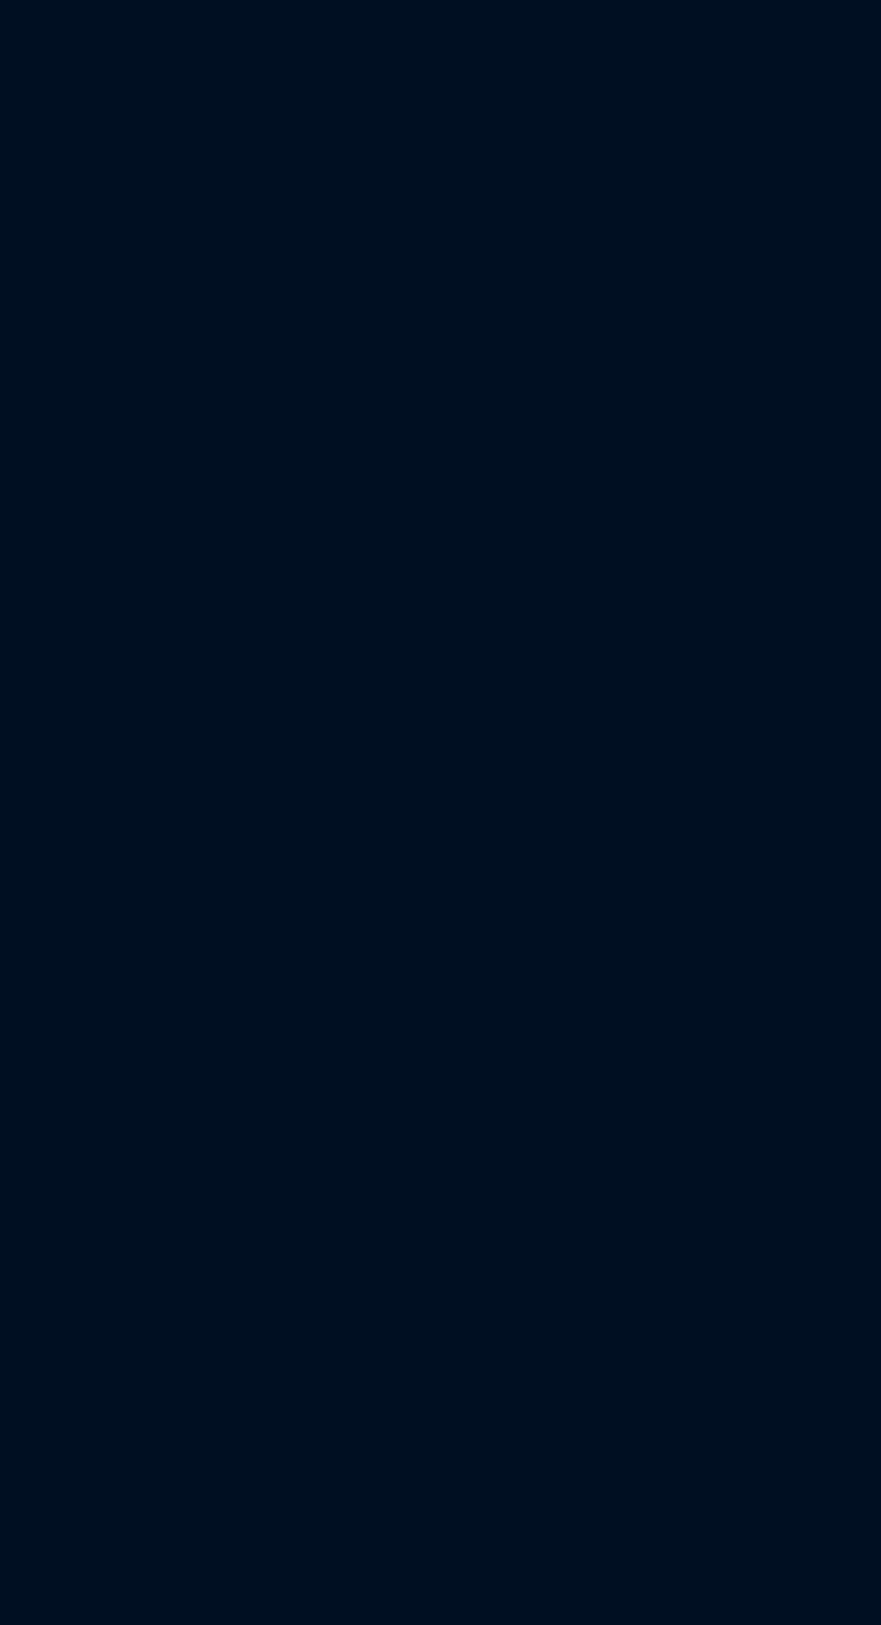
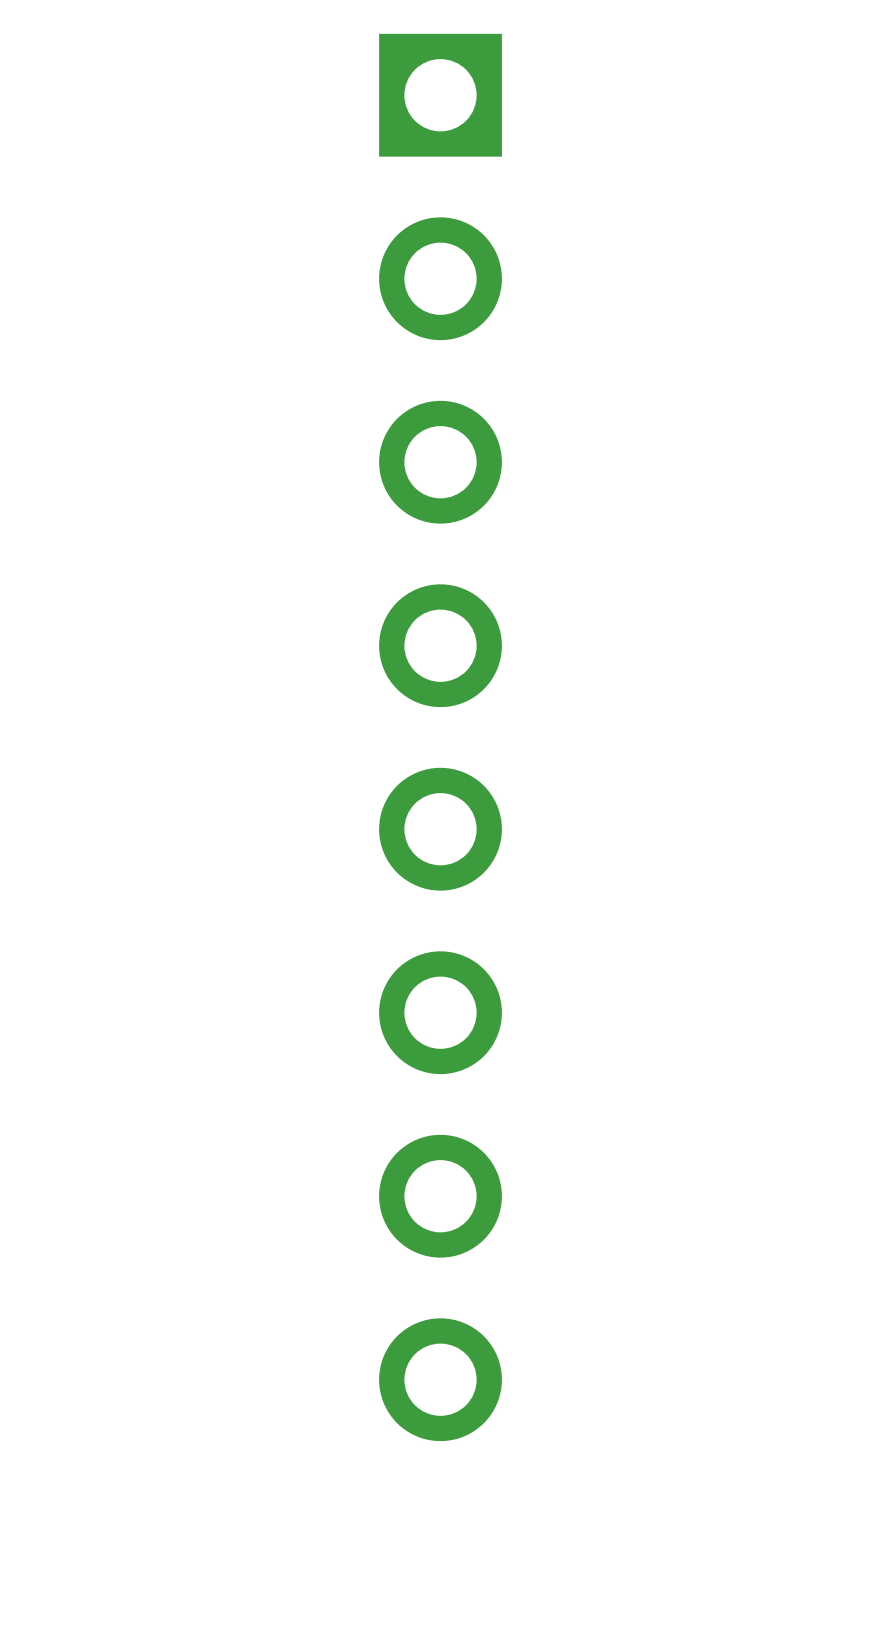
part: none -> (440, 737)

